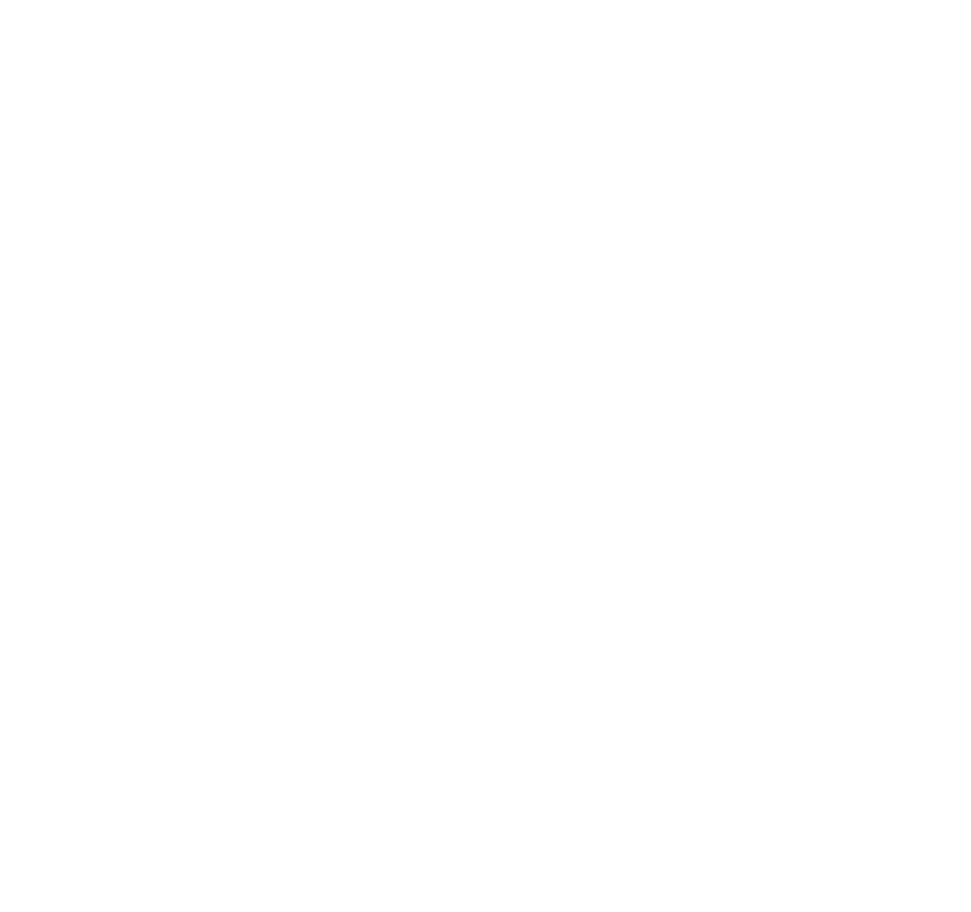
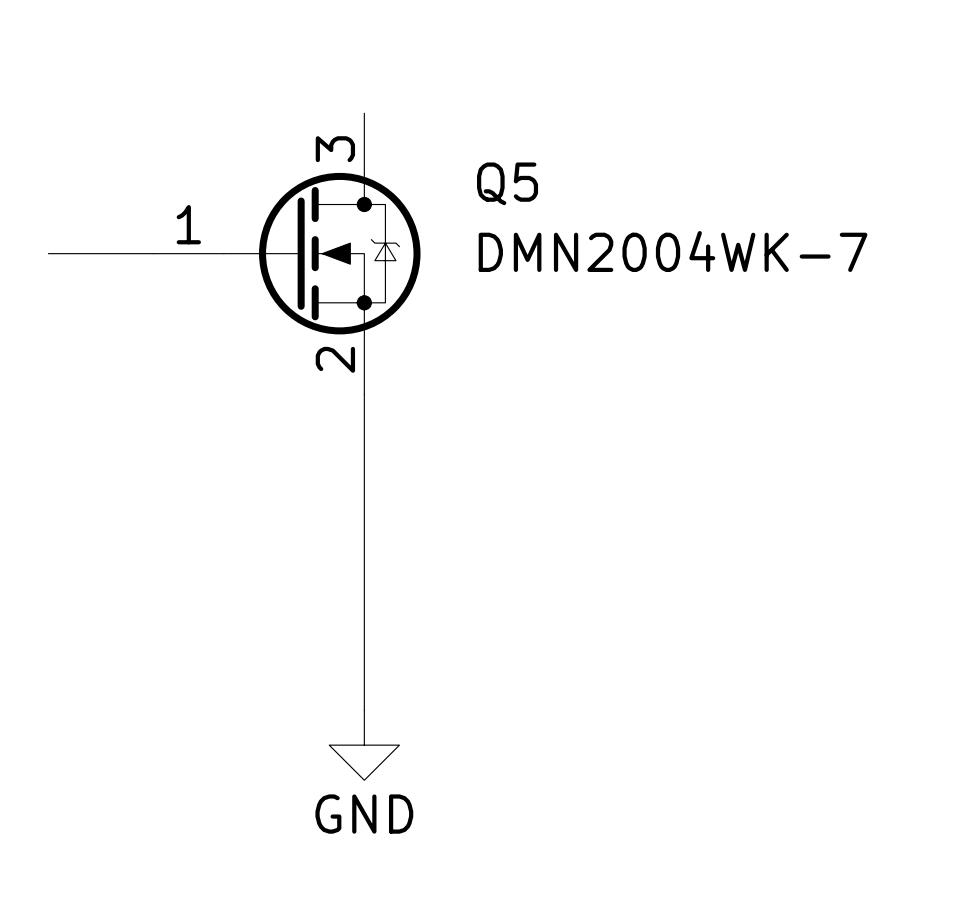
wire: none -> (48, 253) (153, 253)
Q5: none -> DMN2004WK-7 (287, 253)
wire: none -> (364, 394) (364, 710)
power symbol: none -> GND (364, 745)

